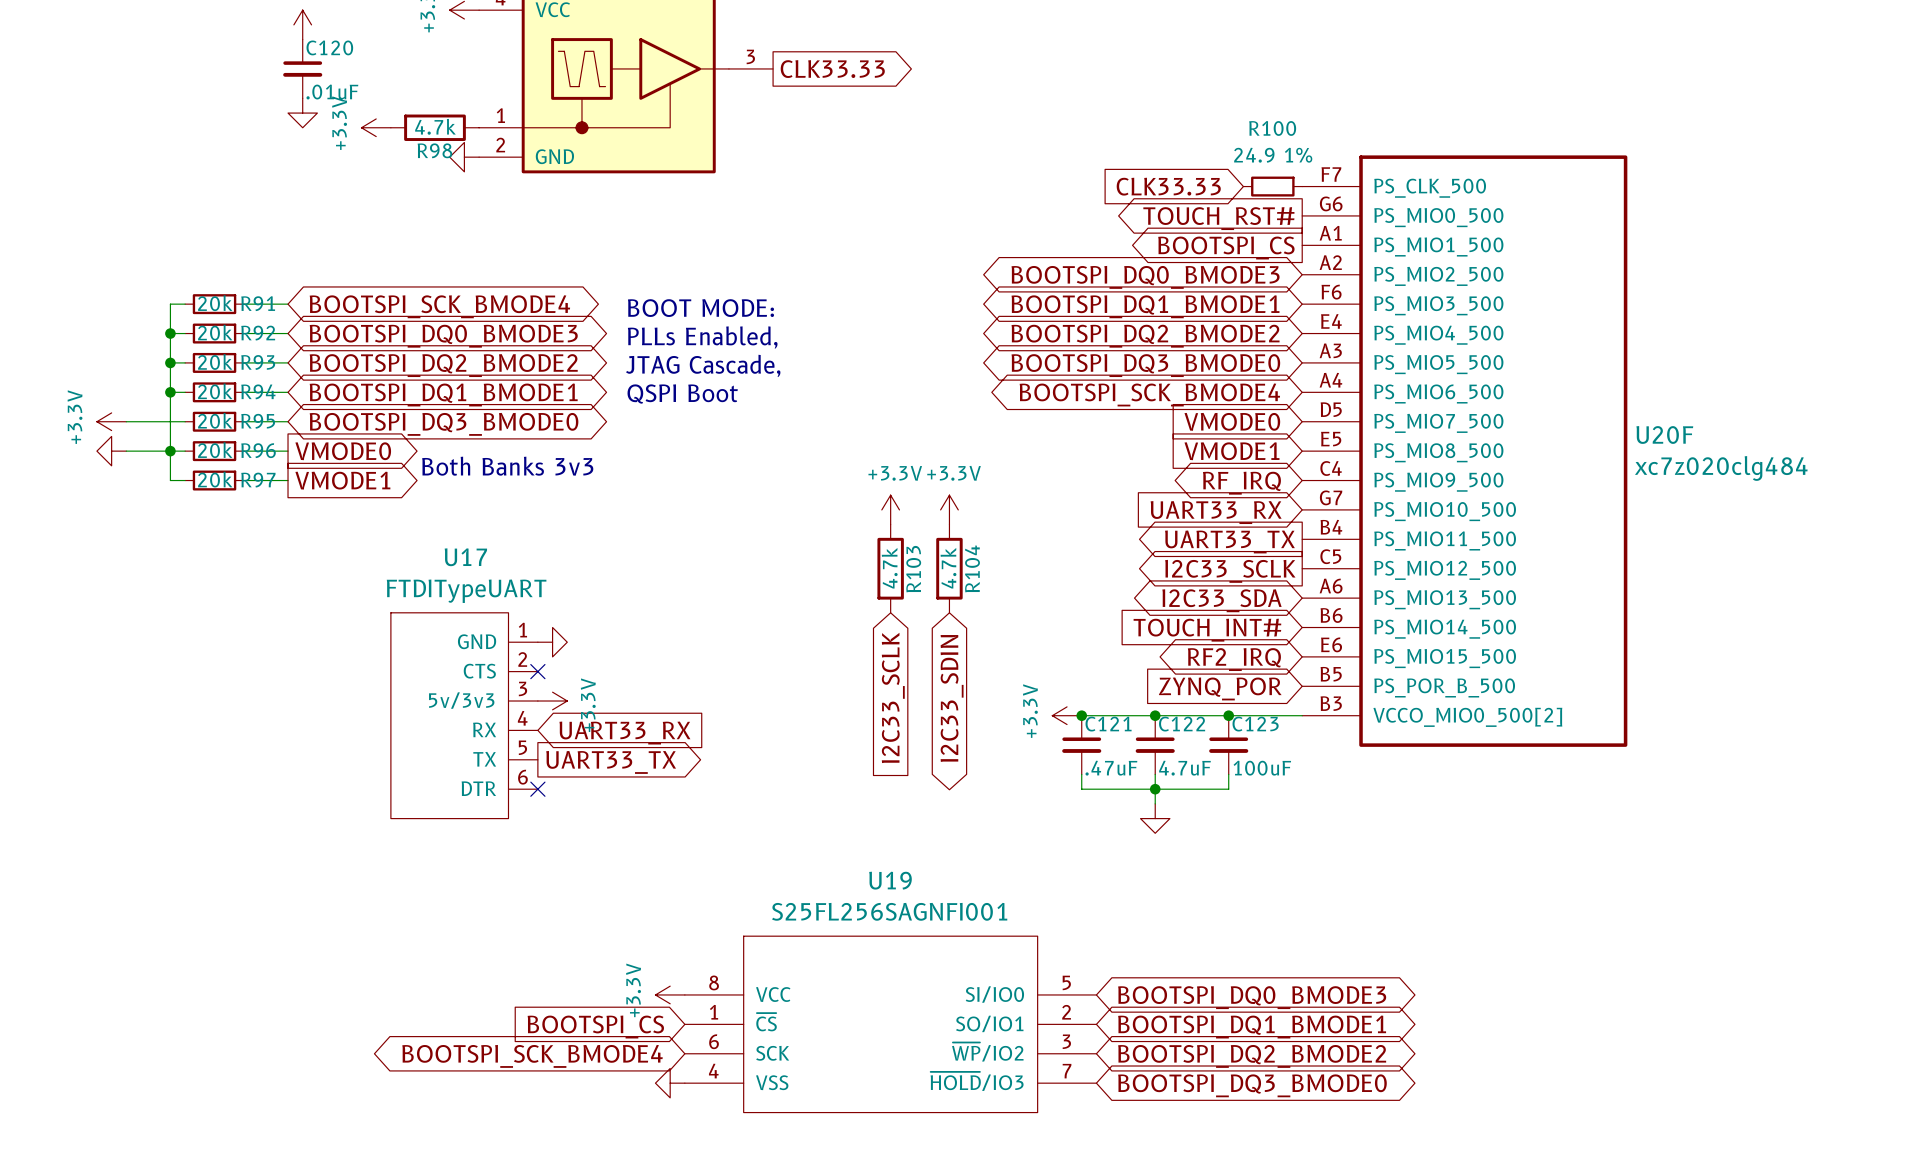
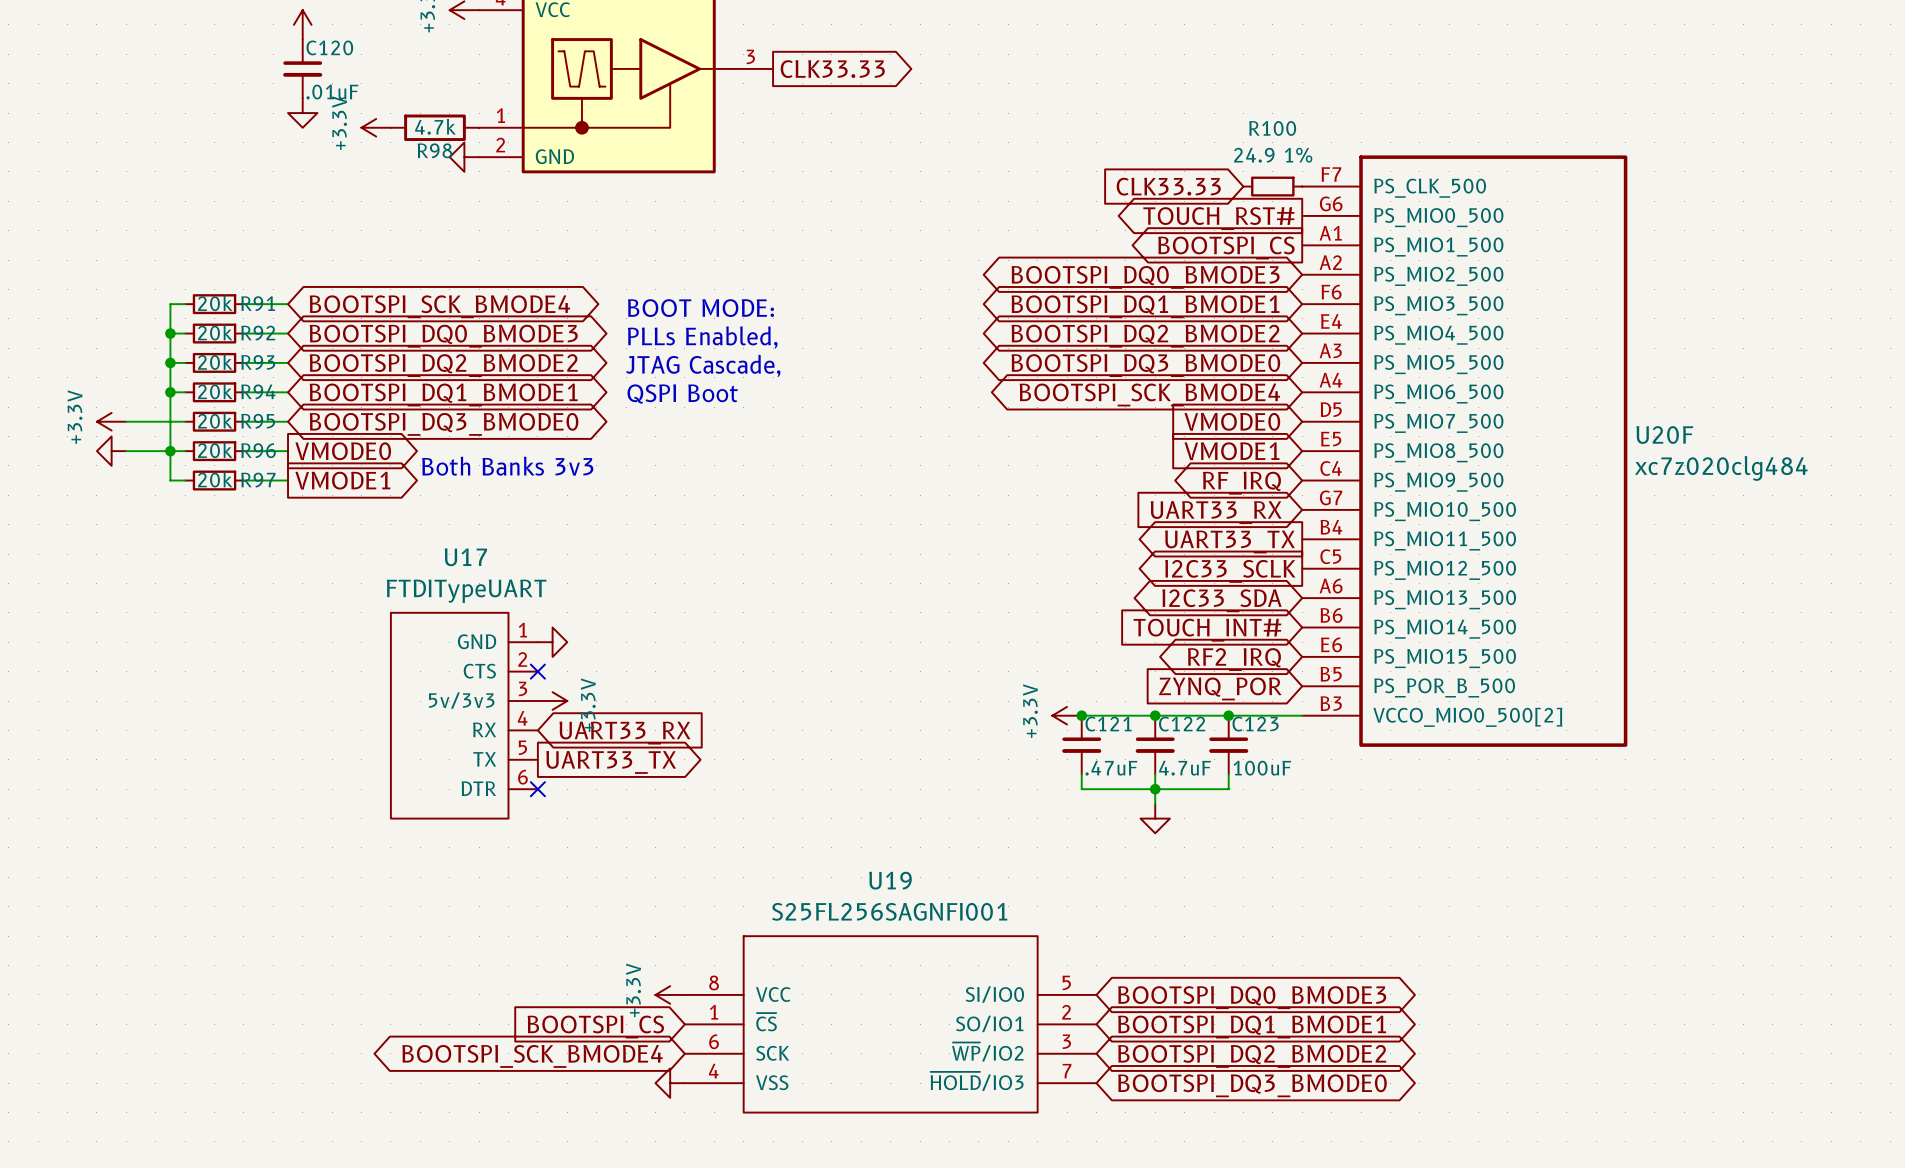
power symbol: +3.3V (890, 509) -> none
power symbol: +3.3V (949, 509) -> none
R103: 4.7k (890, 568) -> none
R104: 4.7k (949, 568) -> none
global label: I2C33_SCLK (893, 697) -> none
global label: I2C33_SDIN (952, 698) -> none

